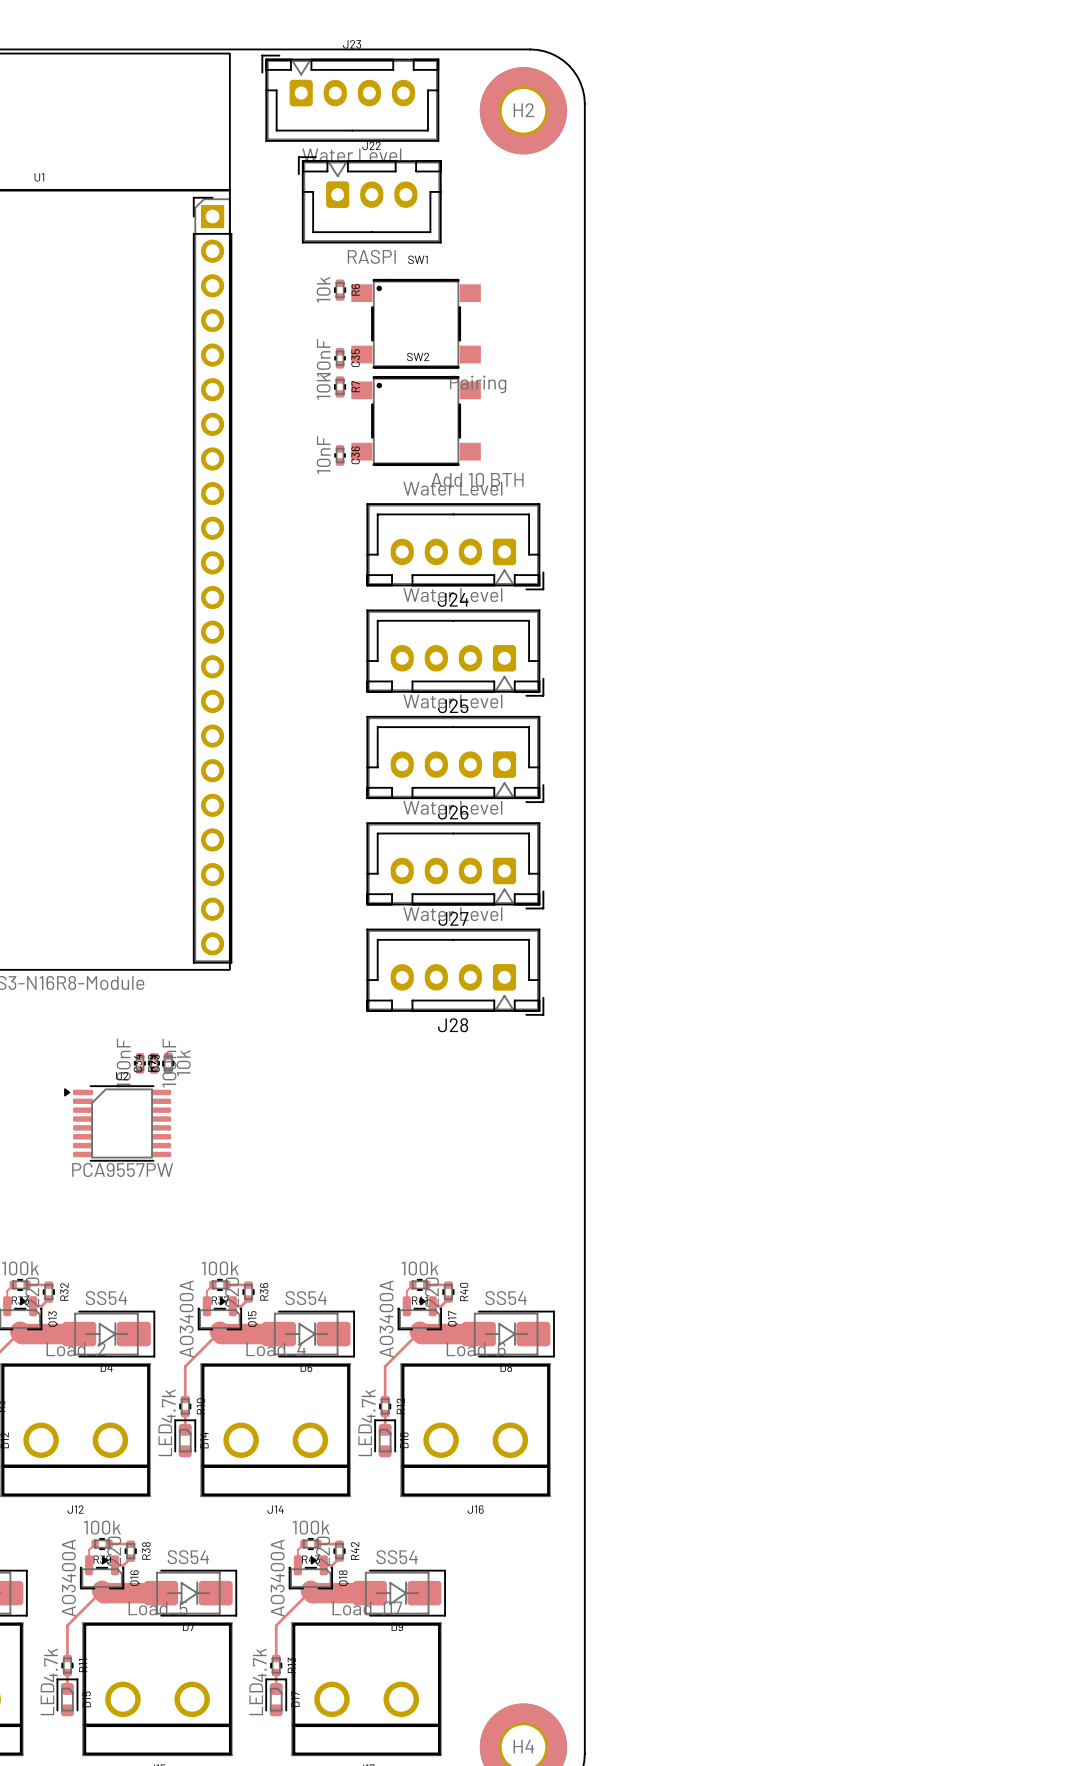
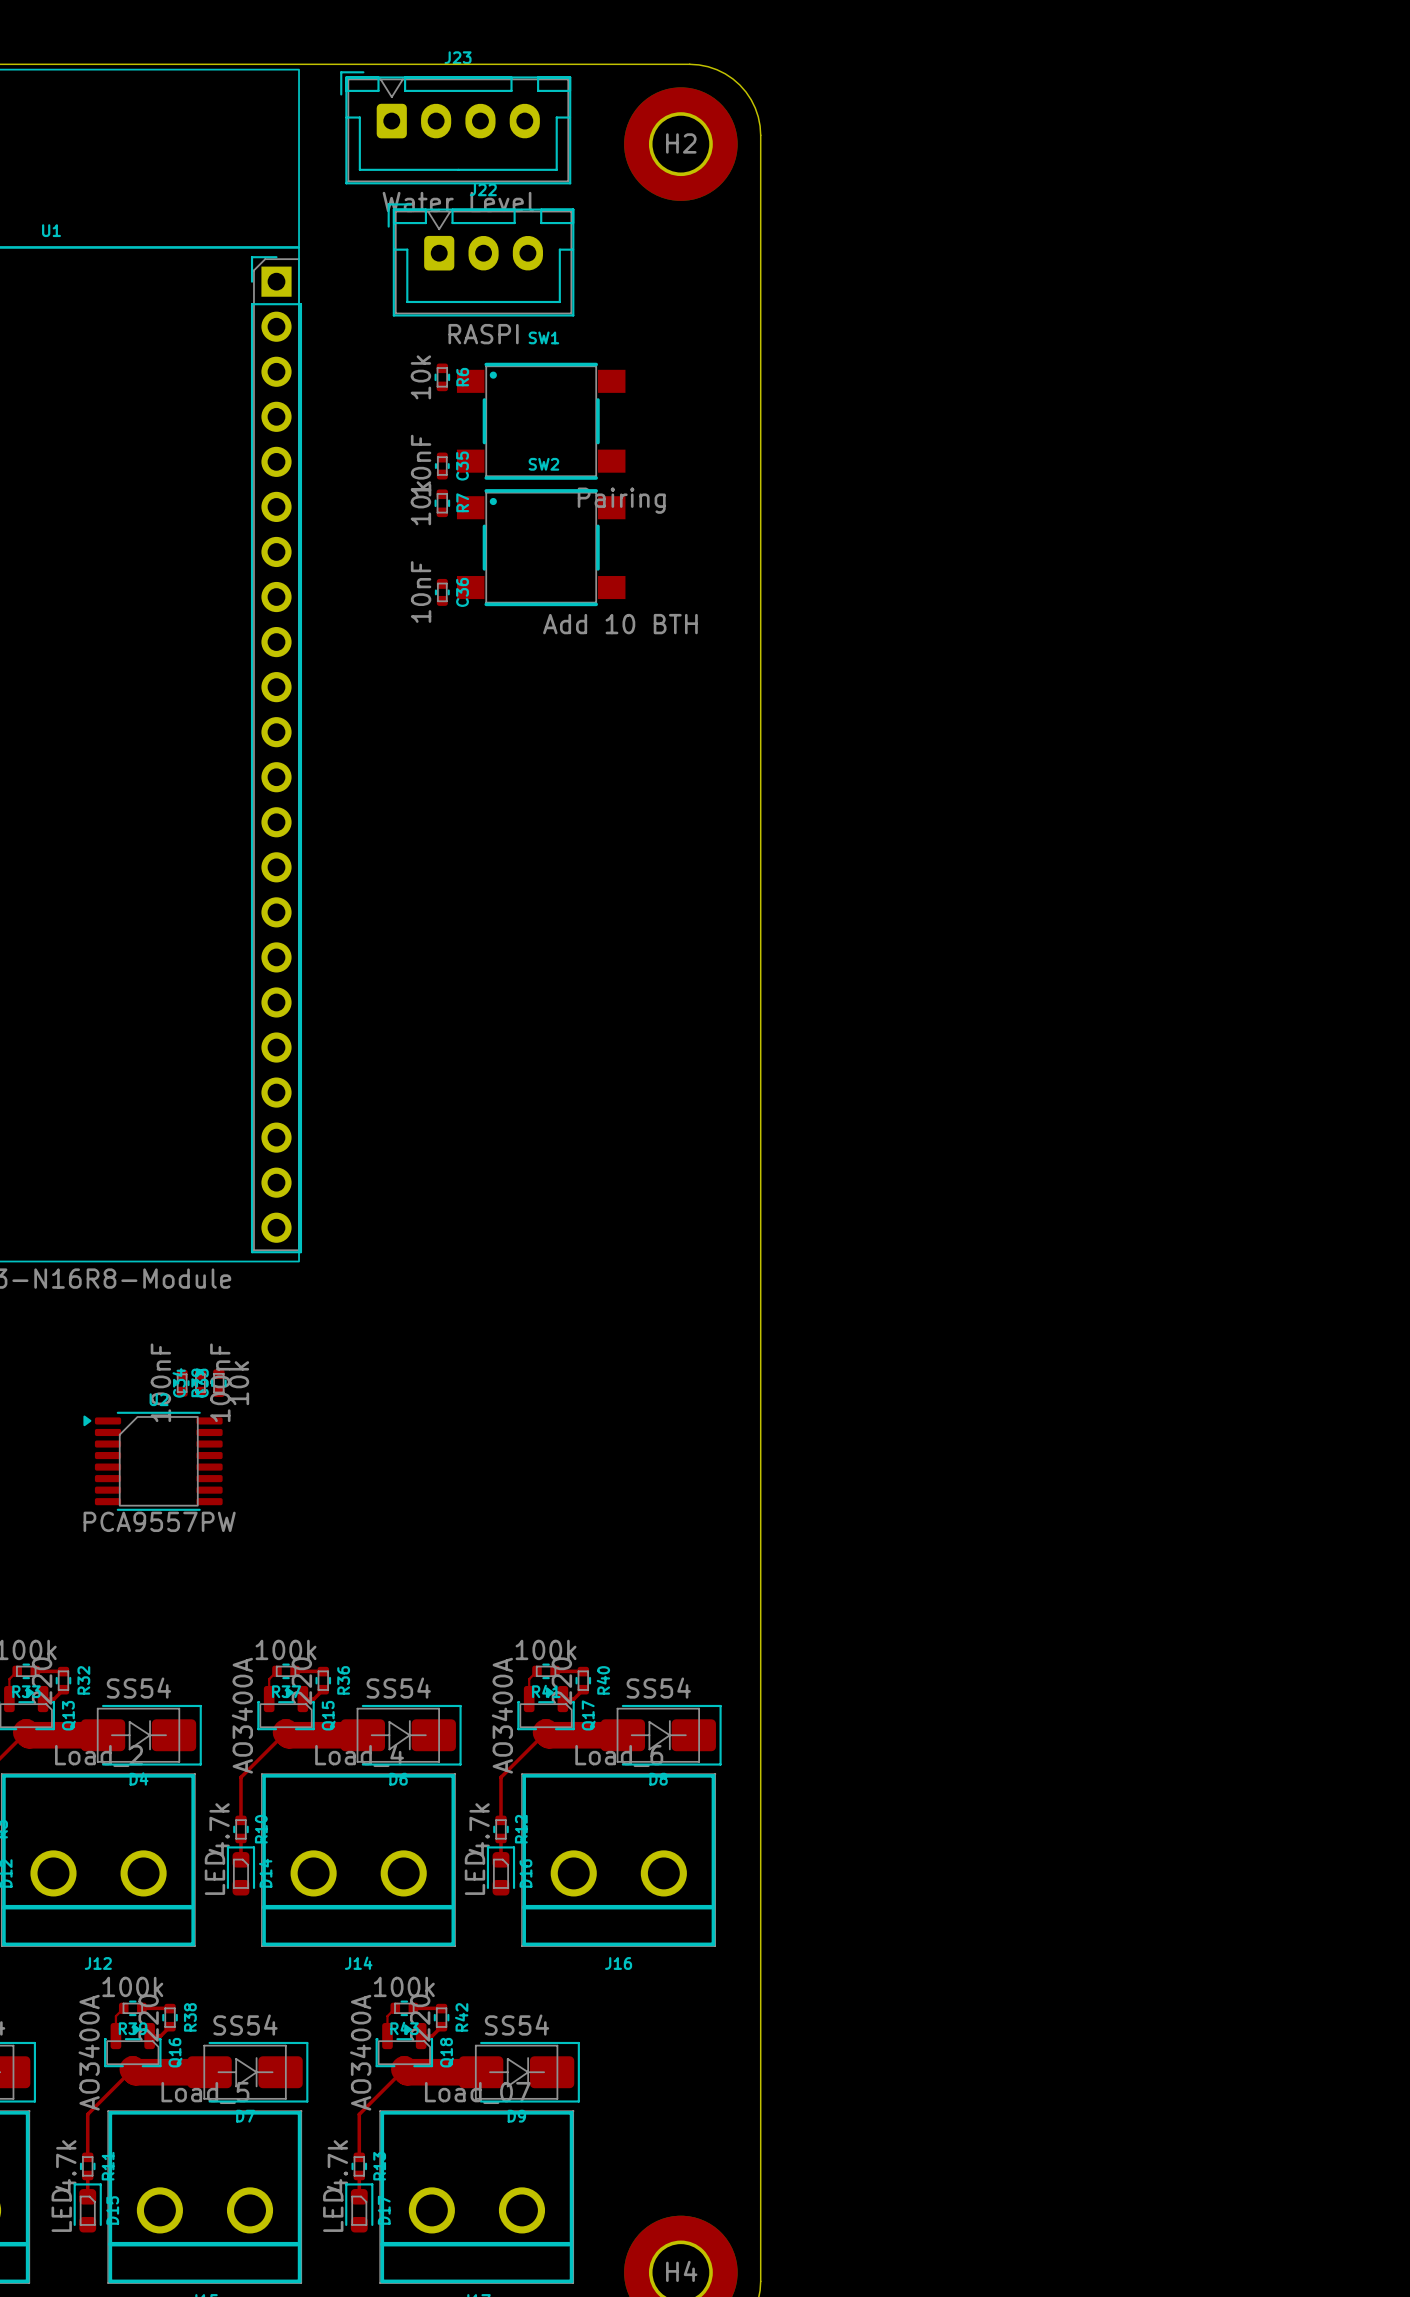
J24: Water Level (455, 546) -> none
J25: Water Level (455, 653) -> none
J26: Water Level (455, 759) -> none
J27: Water Level (455, 865) -> none
J28: Water Level (455, 972) -> none

